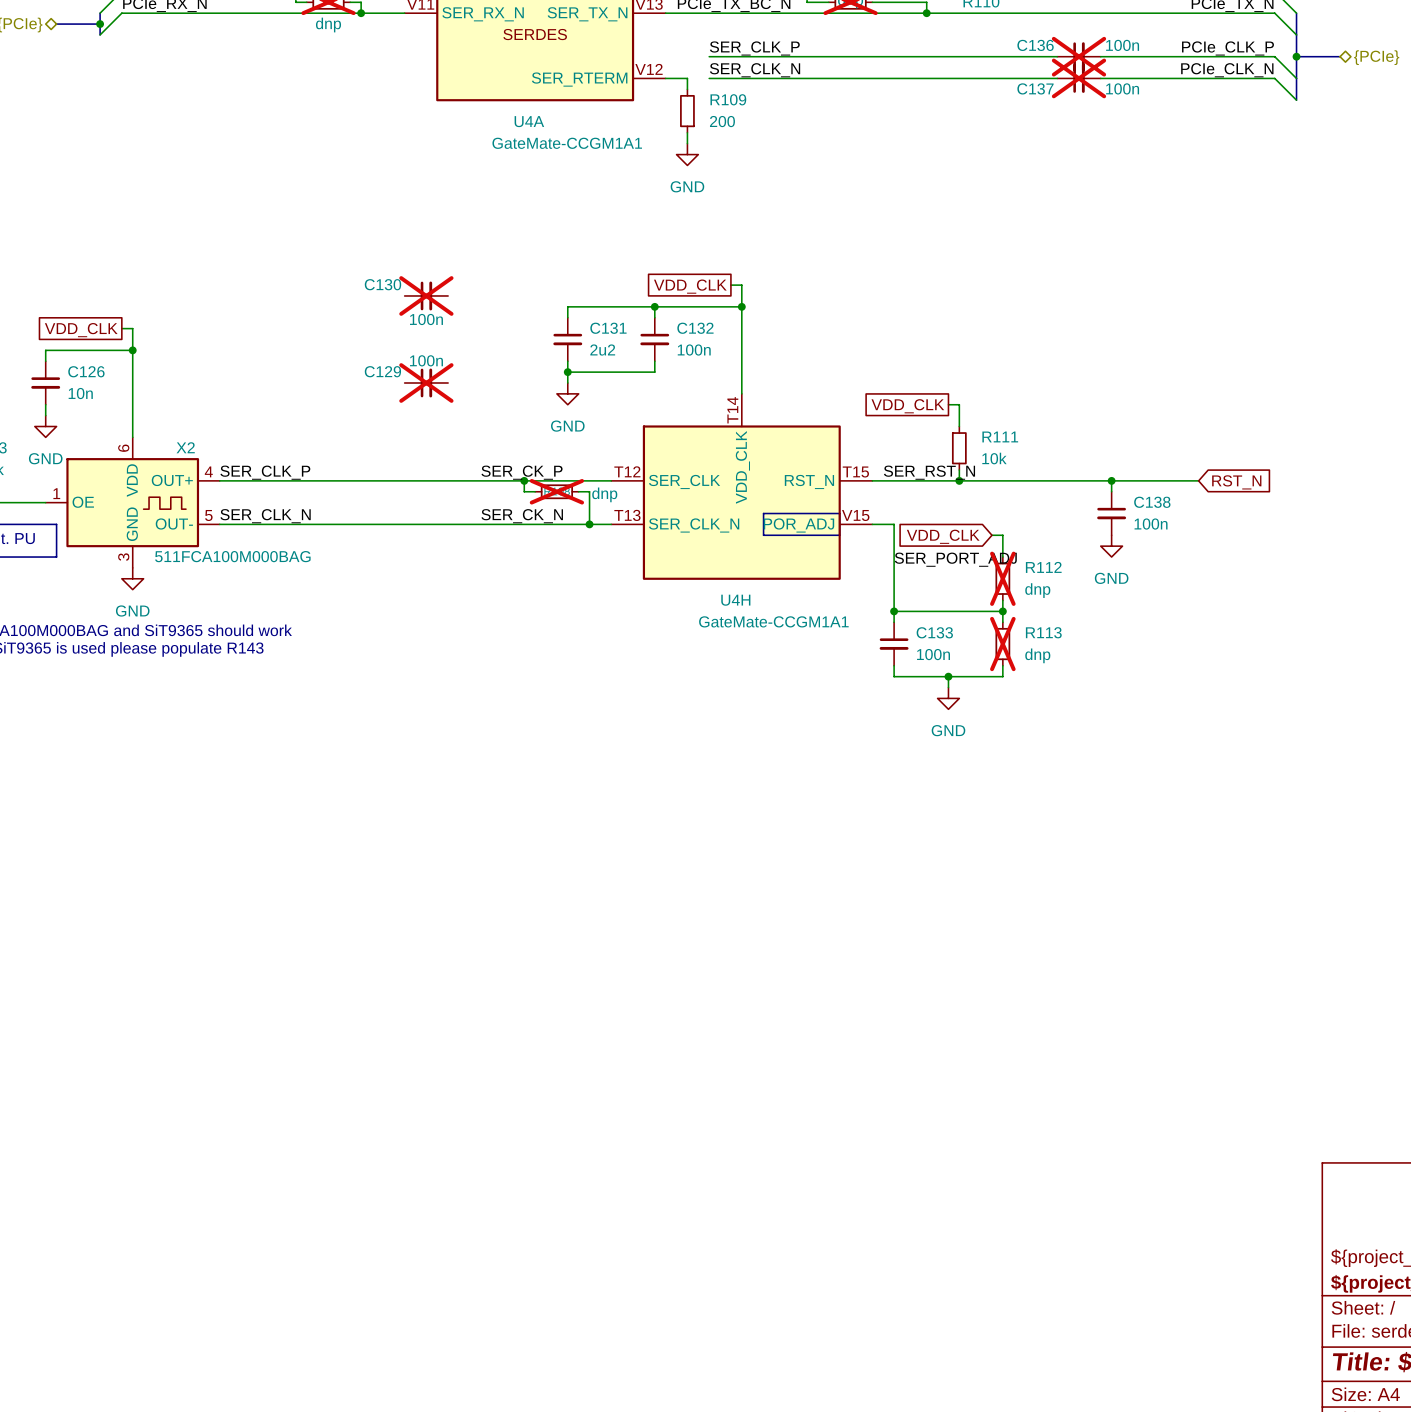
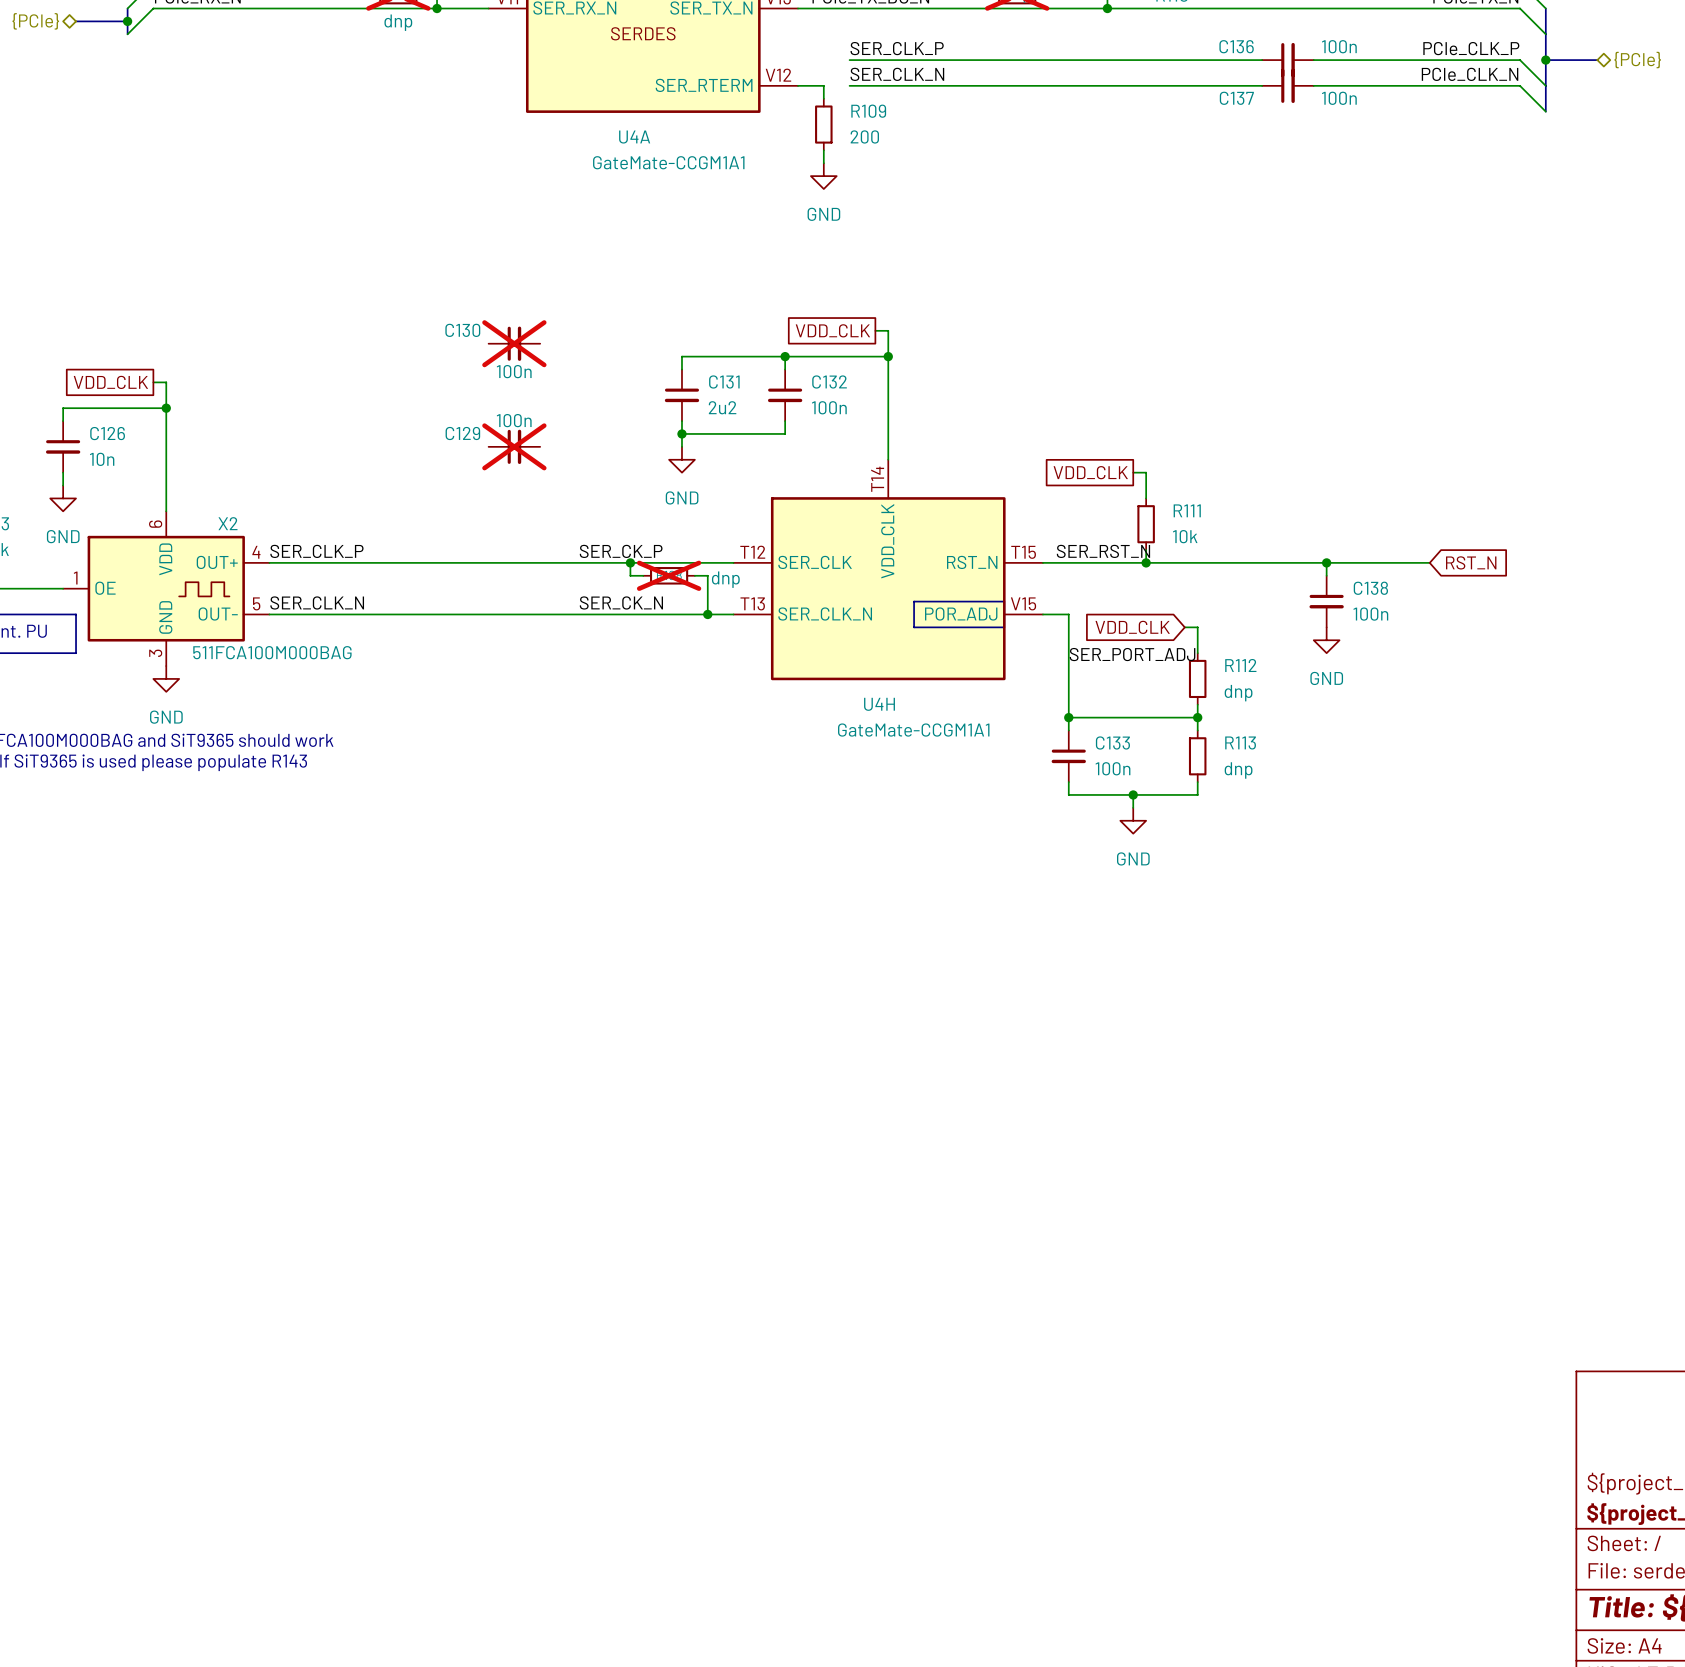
C136 do-not-place cross: (1078, 56) -> none
C137 do-not-place cross: (1078, 78) -> none
R112 do-not-place cross: (1002, 578) -> none
R113 do-not-place cross: (1002, 644) -> none

